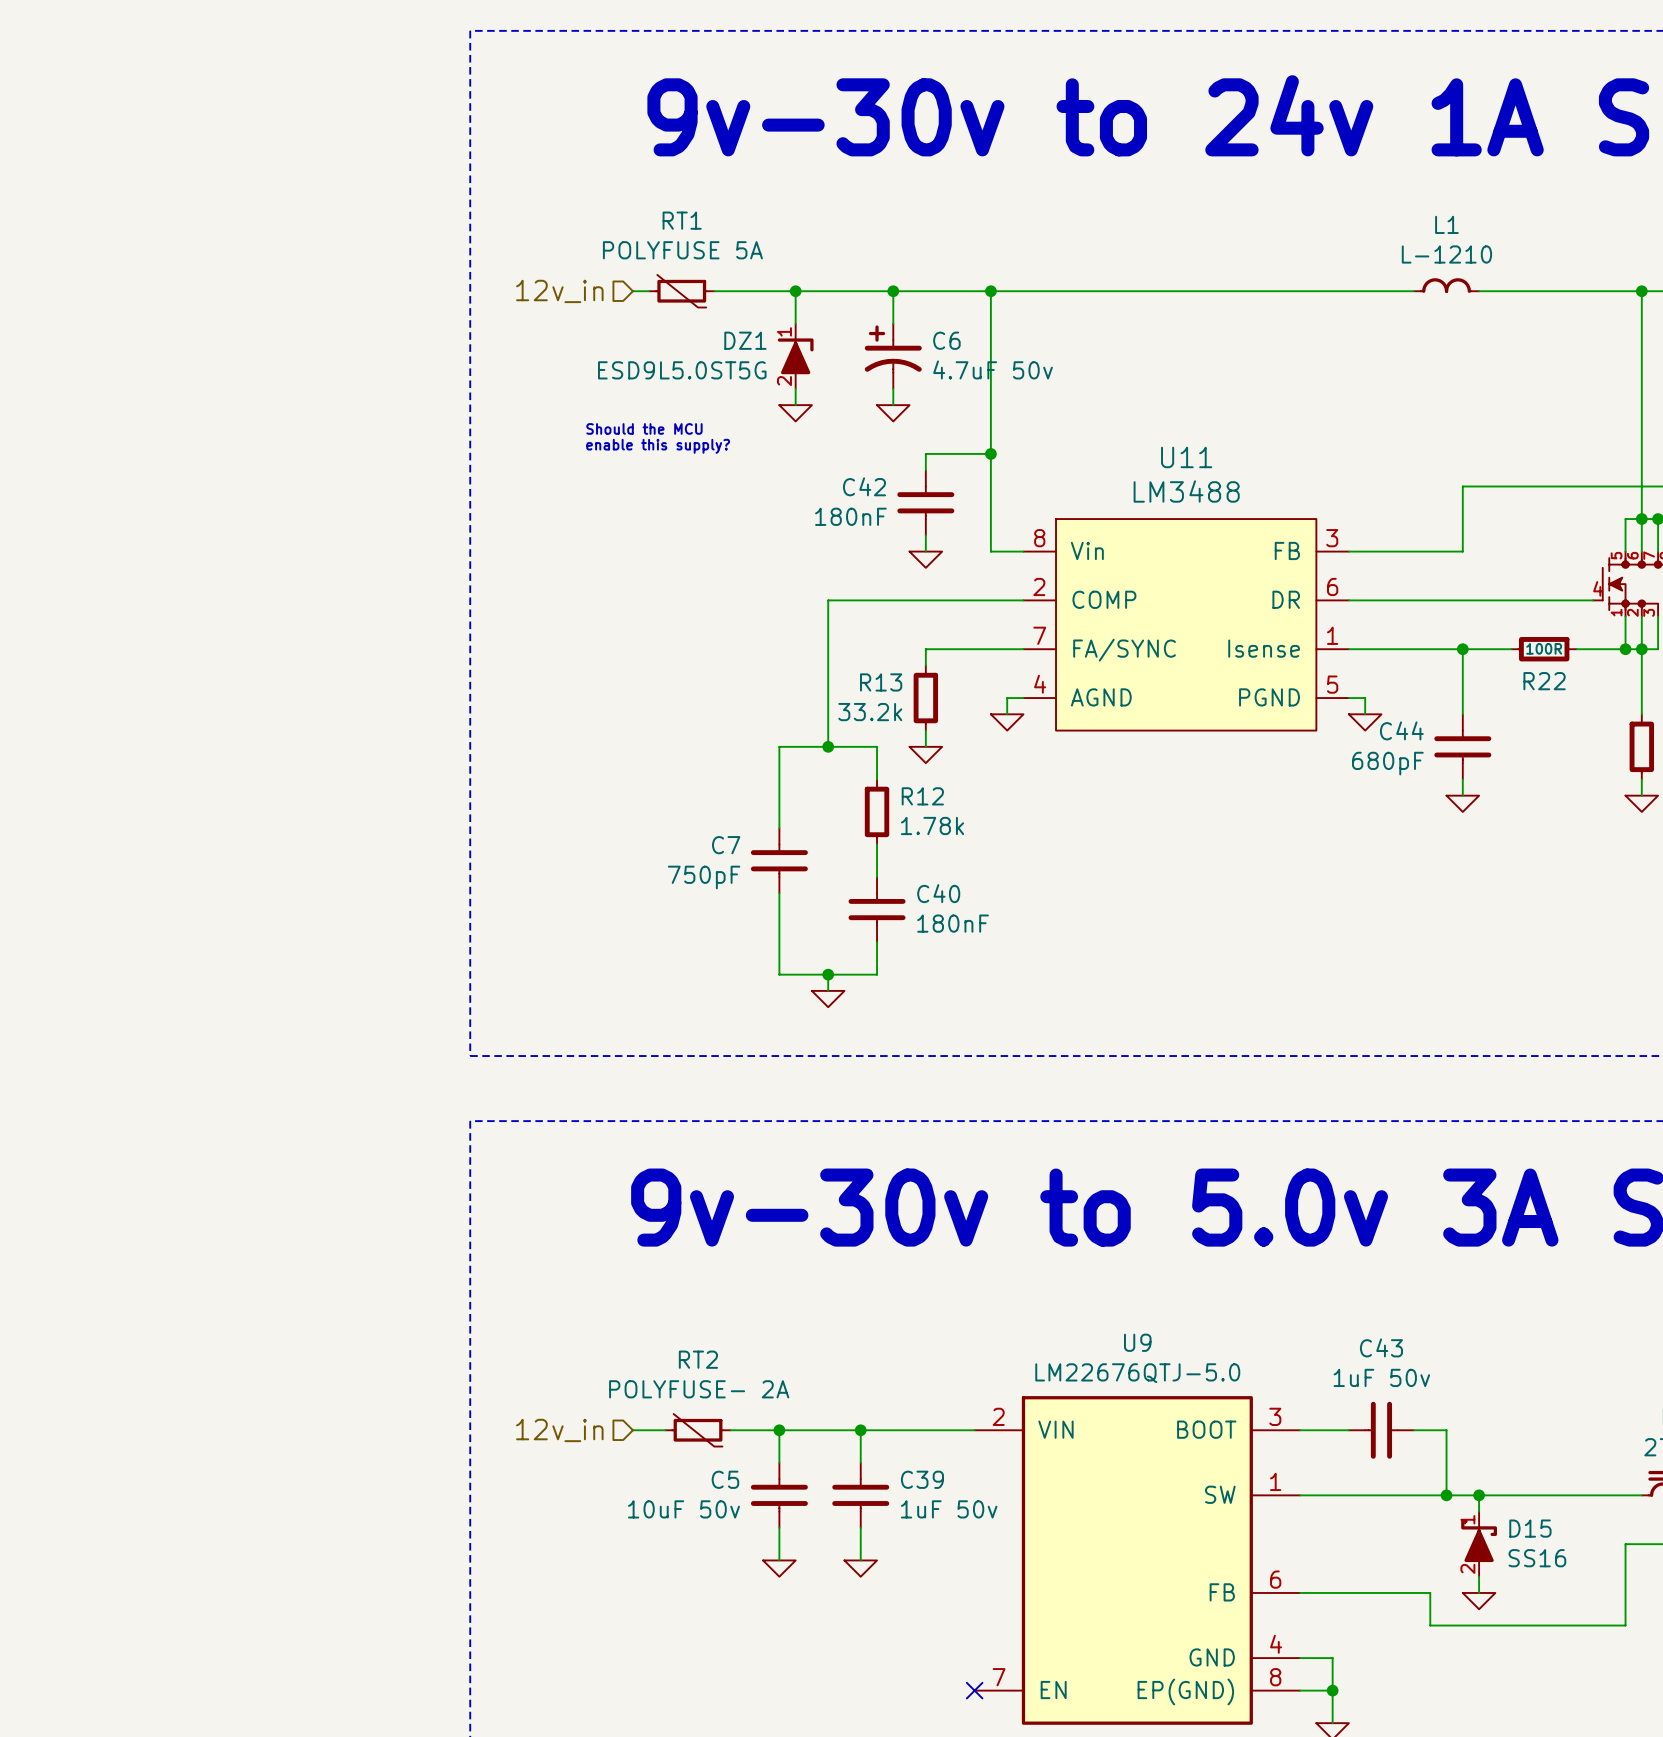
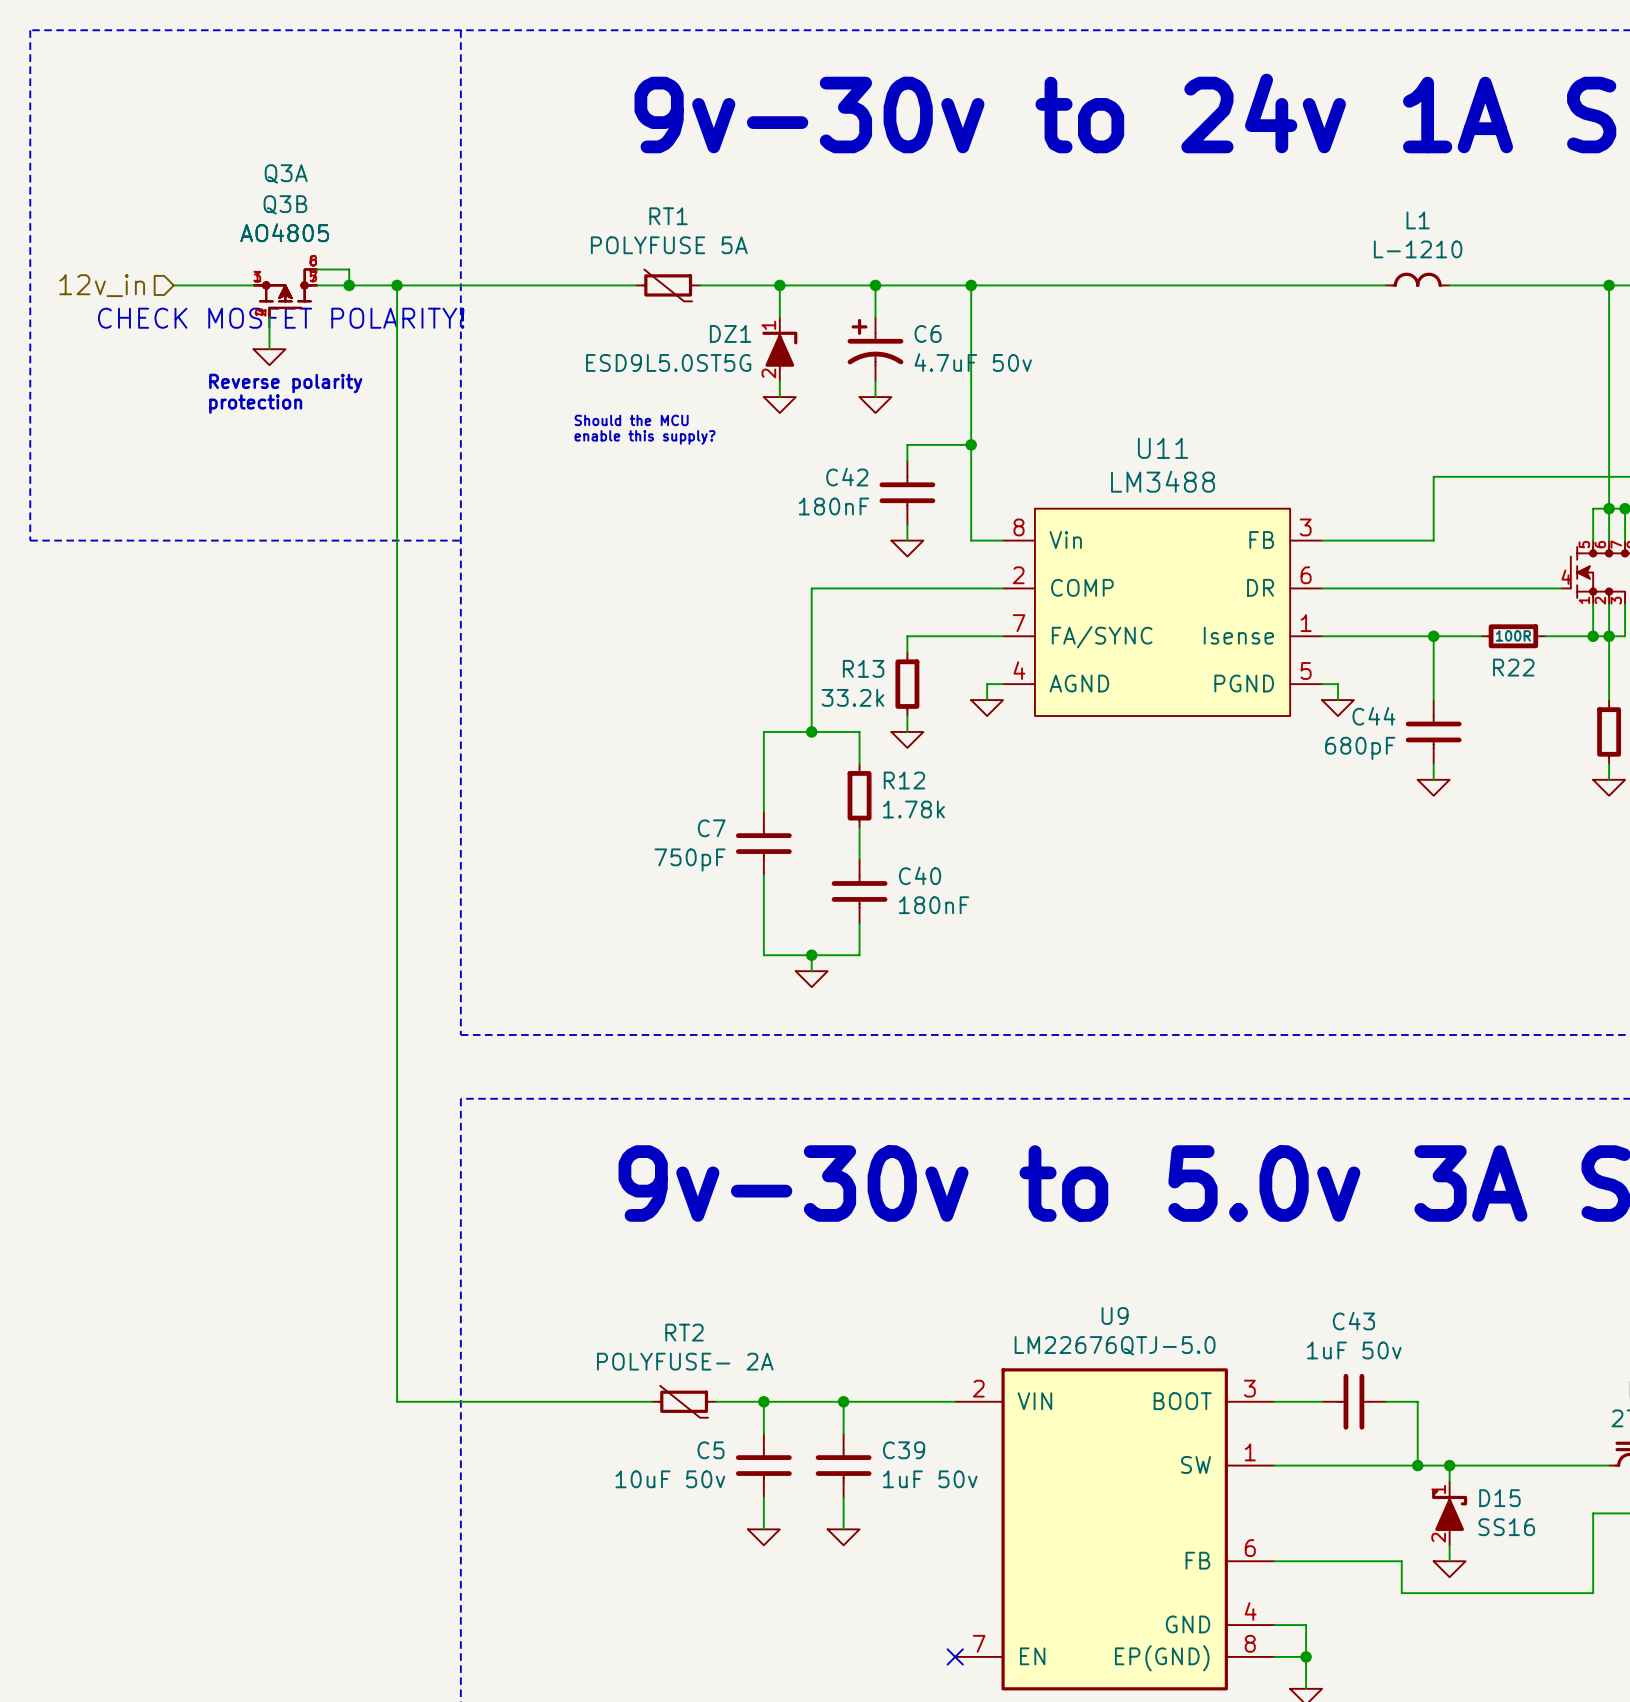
line: none -> (460, 30) (30, 30) (30, 540) (460, 540)
wire: none -> (317, 269) (349, 269) (349, 285)
hierarchical label: none -> 12v_in (102, 285)
wire: none -> (173, 285) (253, 285)
wire: none -> (317, 285) (620, 285)
junction: none -> (349, 285)
wire: none -> (397, 285) (397, 1401) (620, 1401)
junction: none -> (397, 285)
hierarchical label: 12v_in (559, 291) -> none
Q3A: none -> AO4805 (285, 293)
Q3B: none -> AO4805 (285, 293)
wire: none -> (269, 317) (269, 349)
text: none -> CHECK MOSFET POLARITY! (281, 318)
power symbol: none -> (269, 357)
text: none -> Reverse polarity (285, 383)
text: none -> protection (255, 404)
hierarchical label: 12v_in (559, 1430) -> none

